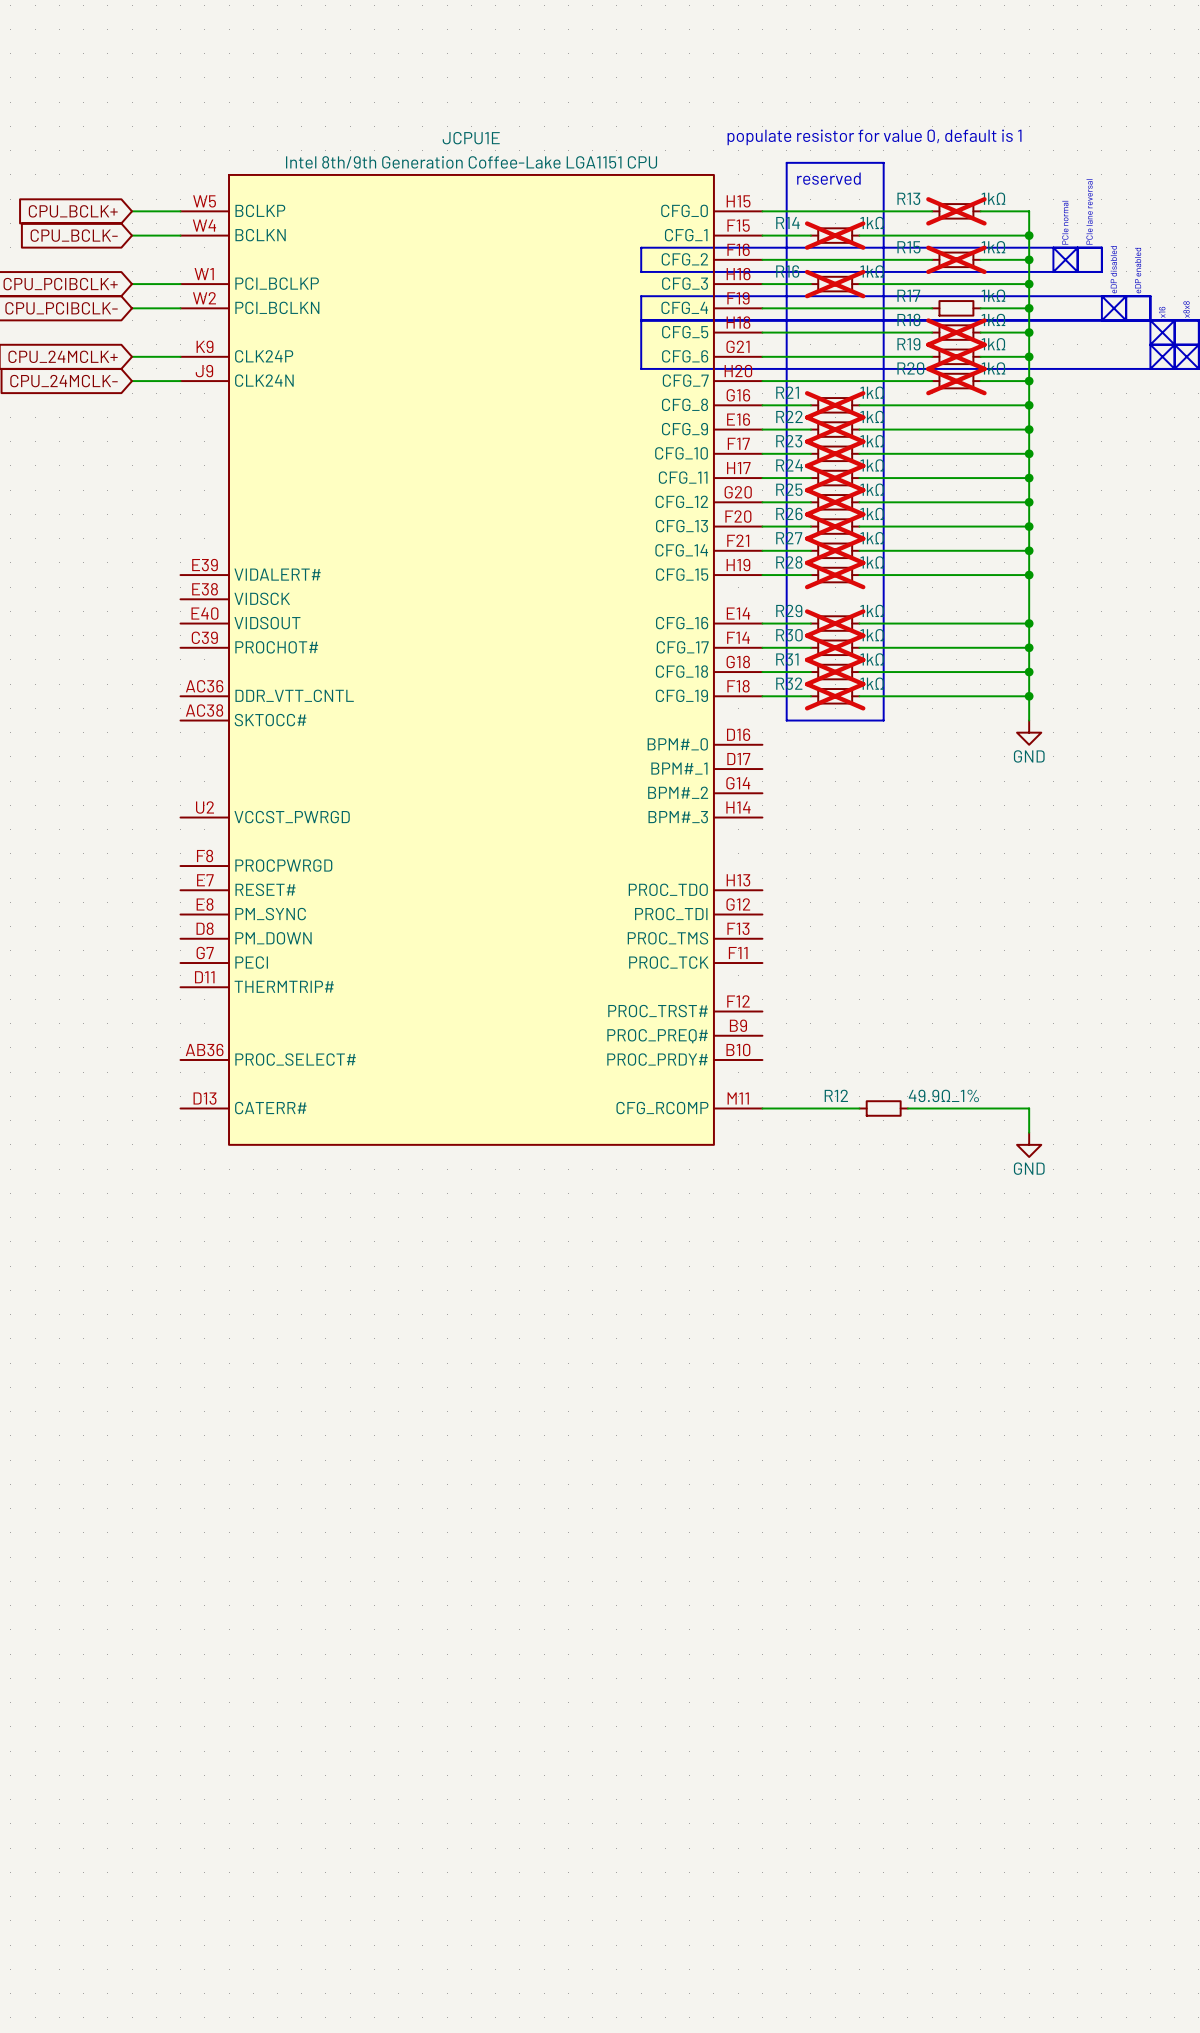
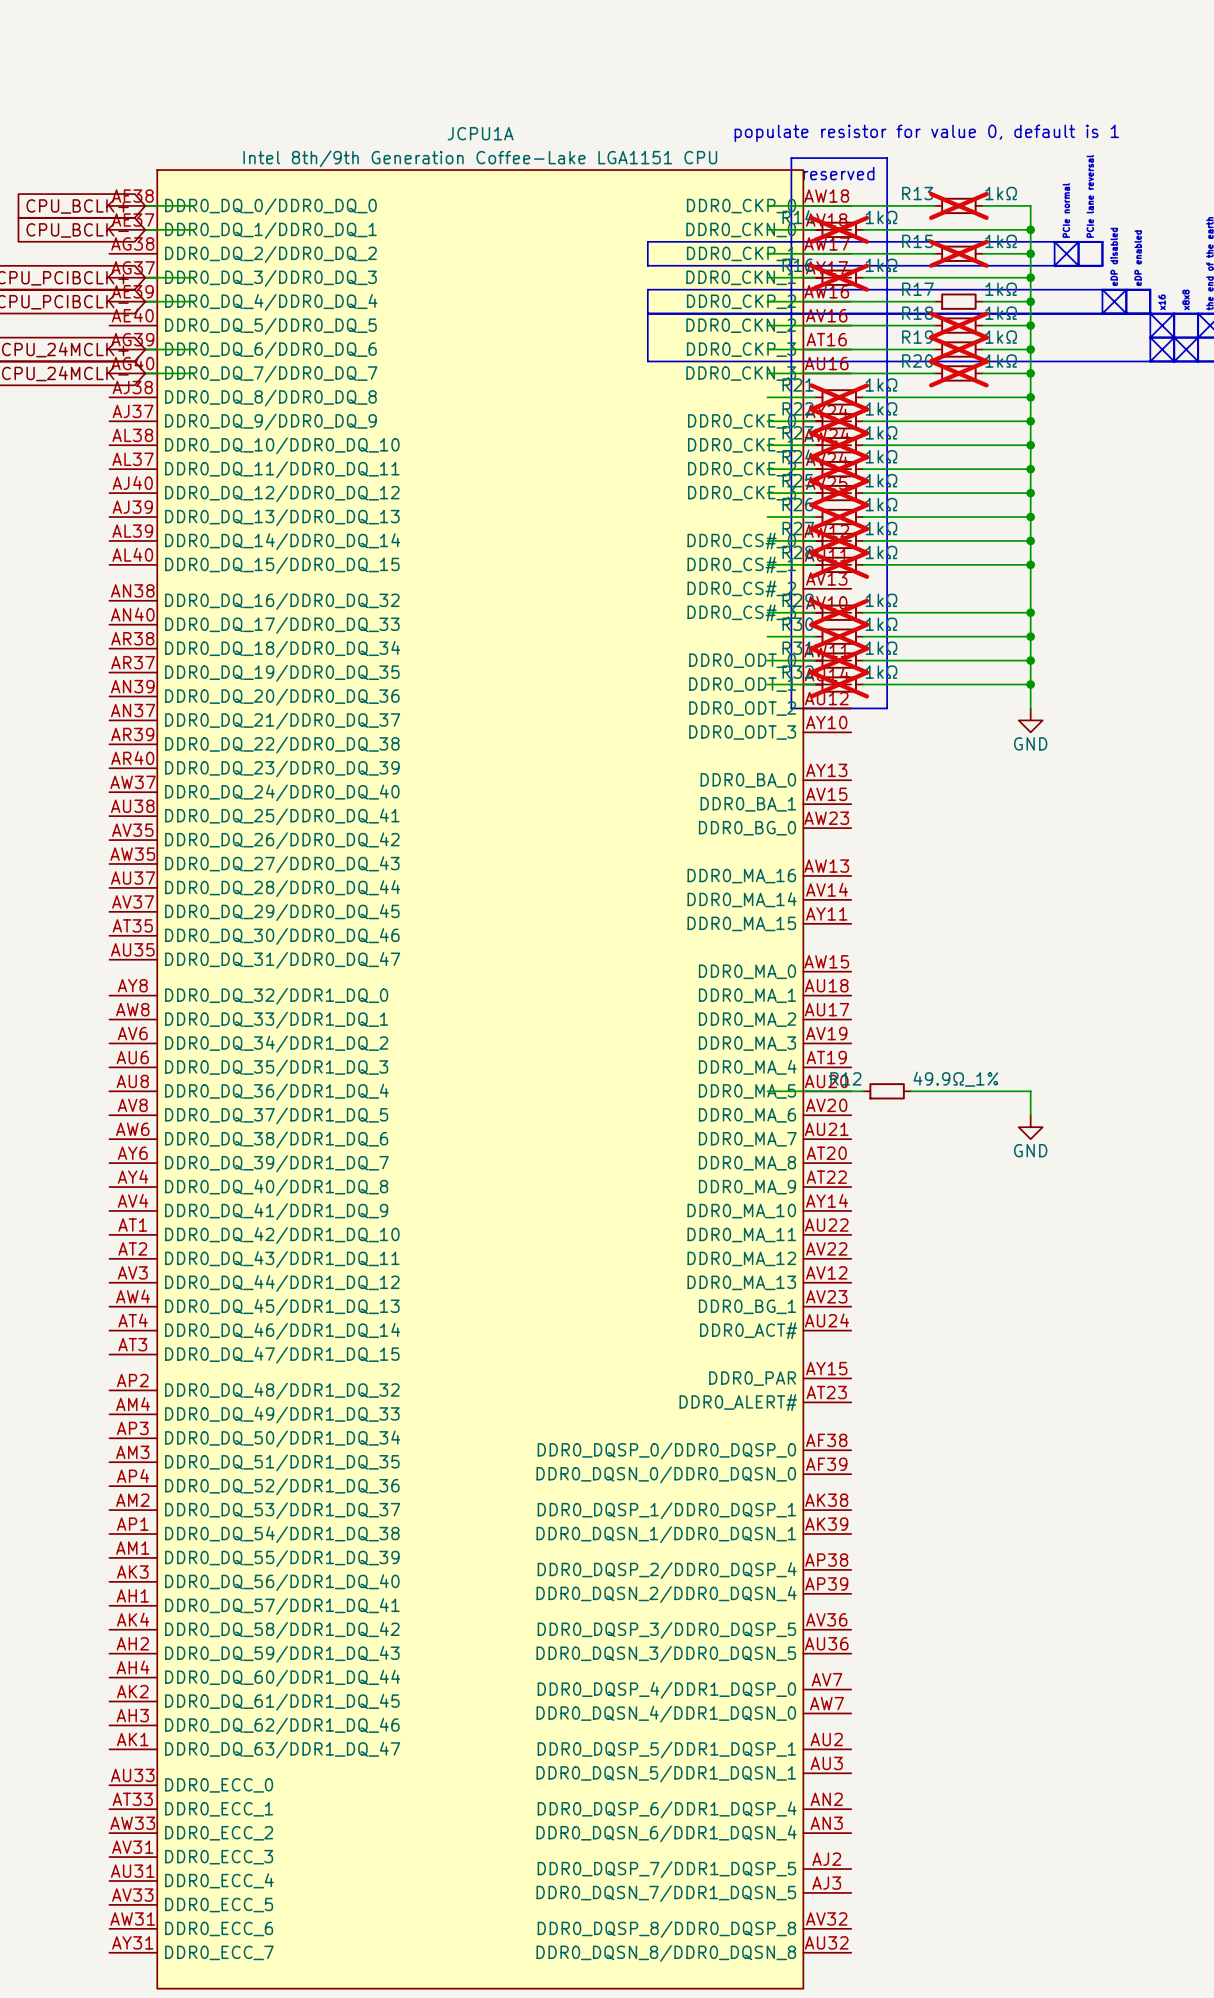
JCPU1E: Intel 8th/9th Generation Coffee-Lake LGA1151 CPU (471, 659) -> none
JCPU1A: none -> Intel 8th/9th Generation Coffee-Lake LGA1151 CPU (480, 1079)

